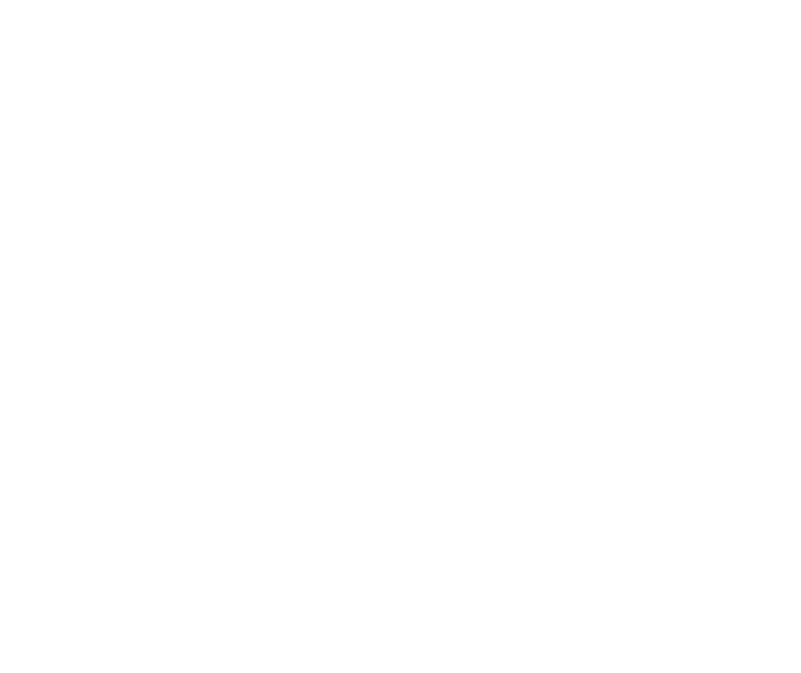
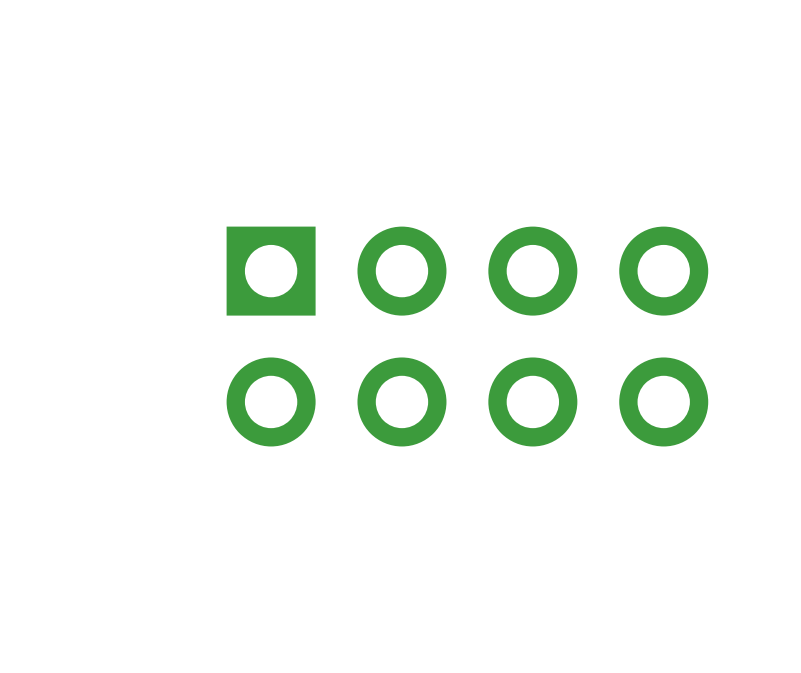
part: none -> (467, 336)

